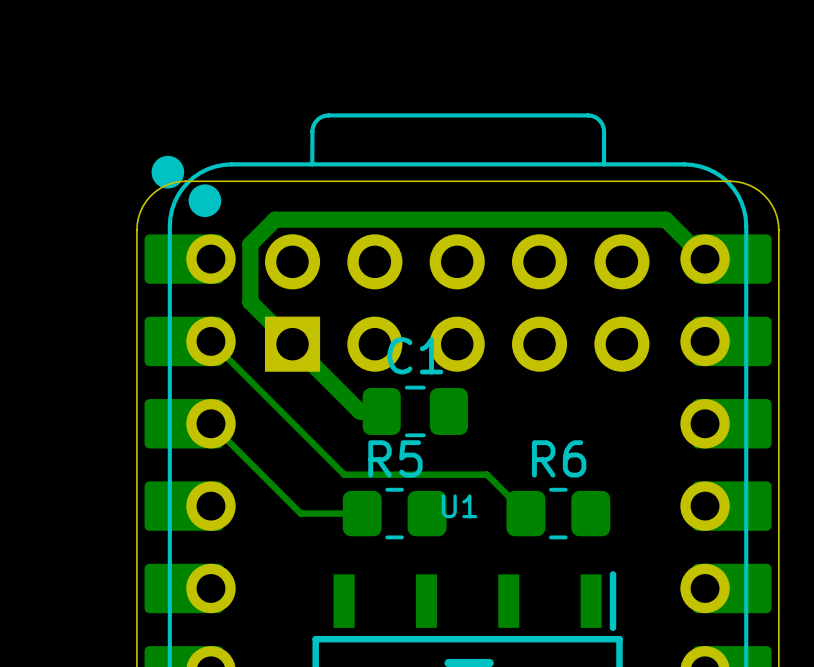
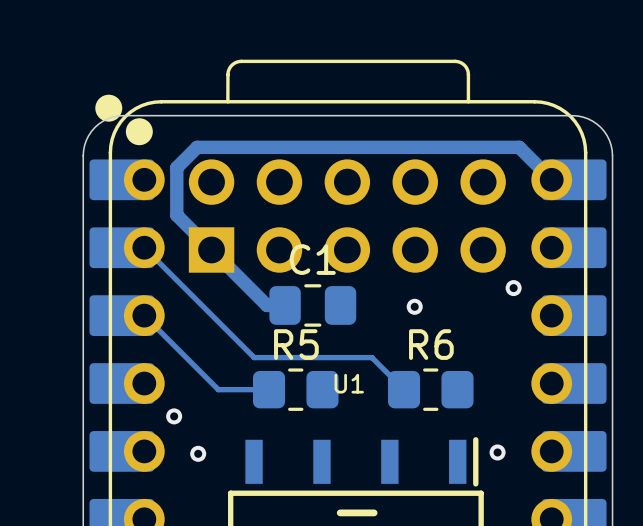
via: none -> (513, 288)
via: none -> (414, 306)
via: none -> (174, 416)
via: none -> (497, 452)
via: none -> (198, 453)

